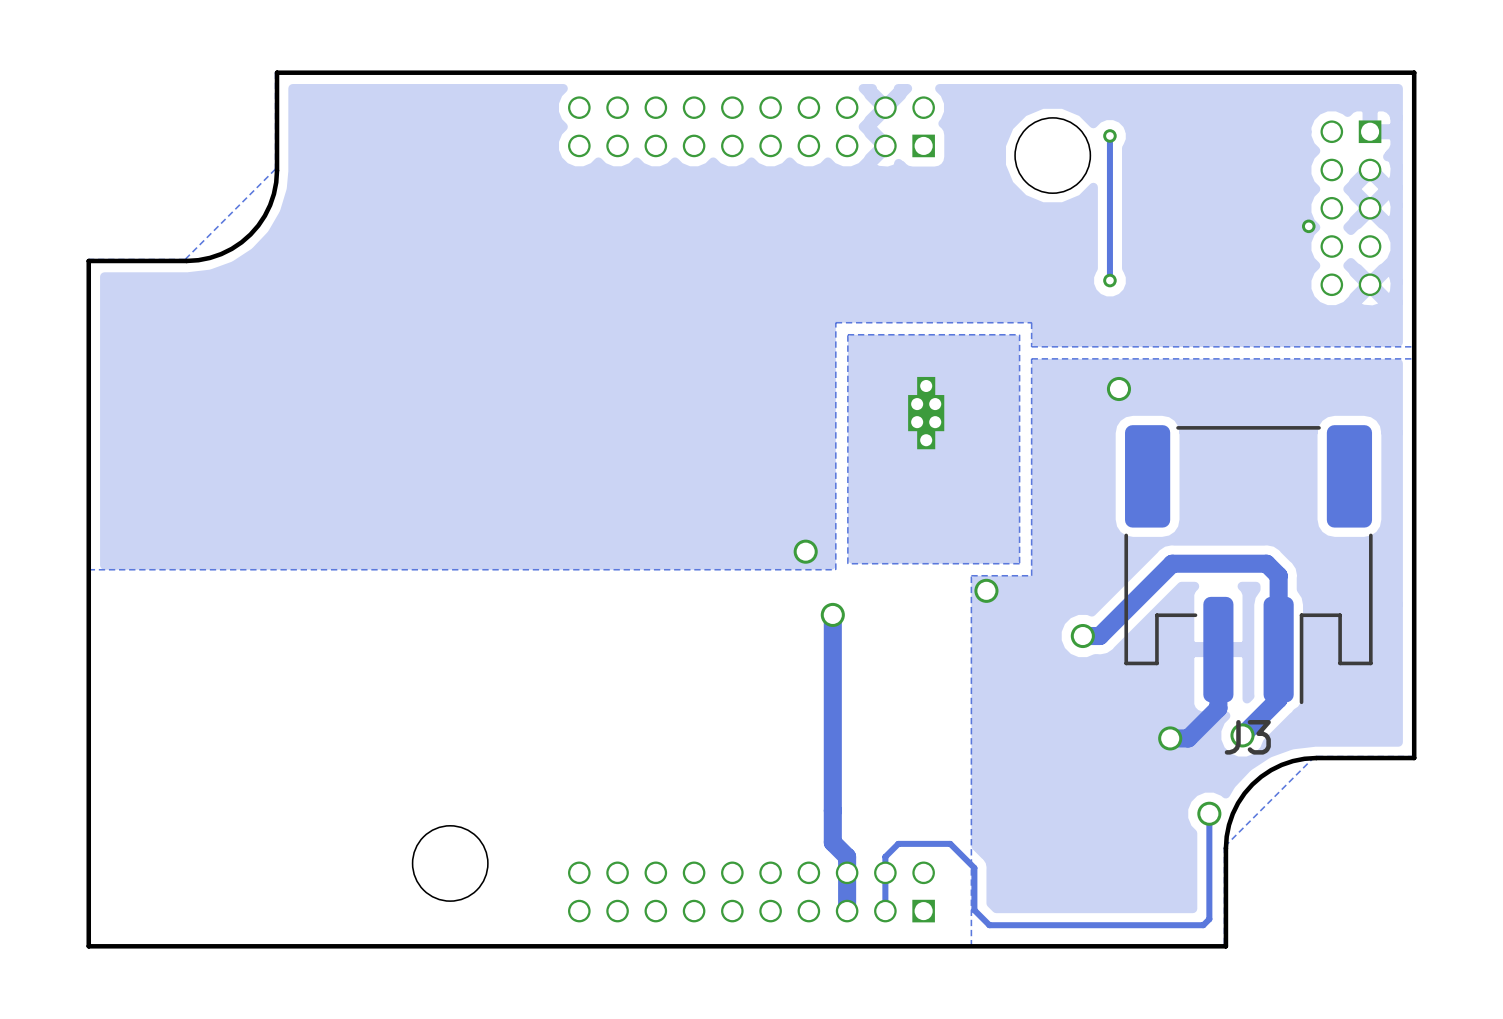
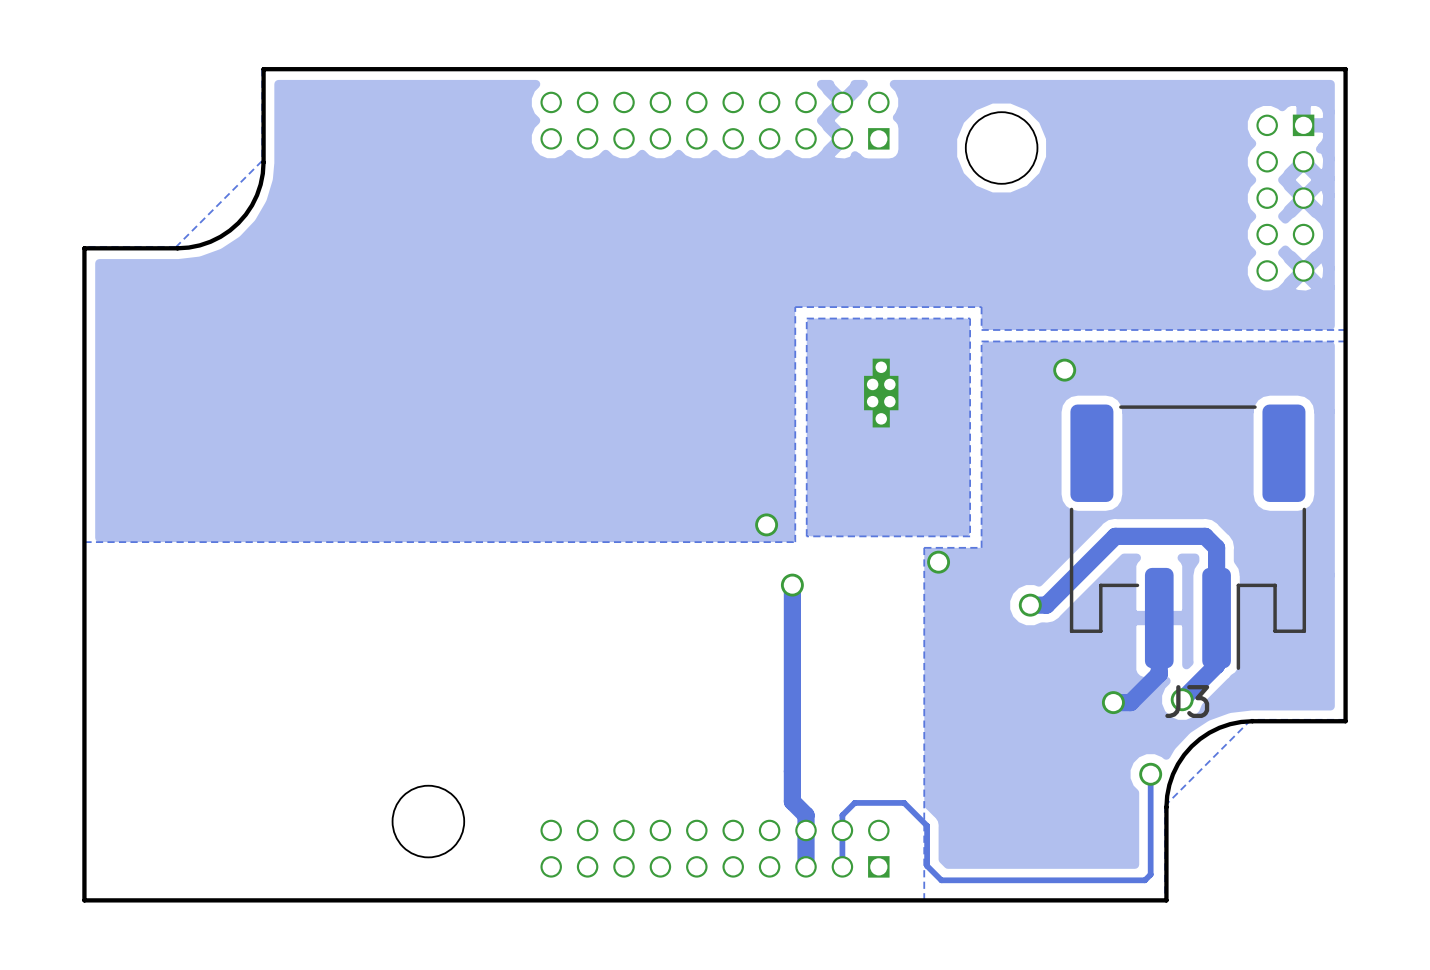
track: (1109, 135) (1109, 280) -> none
via: (1109, 135) -> none
via: (1308, 226) -> none
via: (1109, 280) -> none

